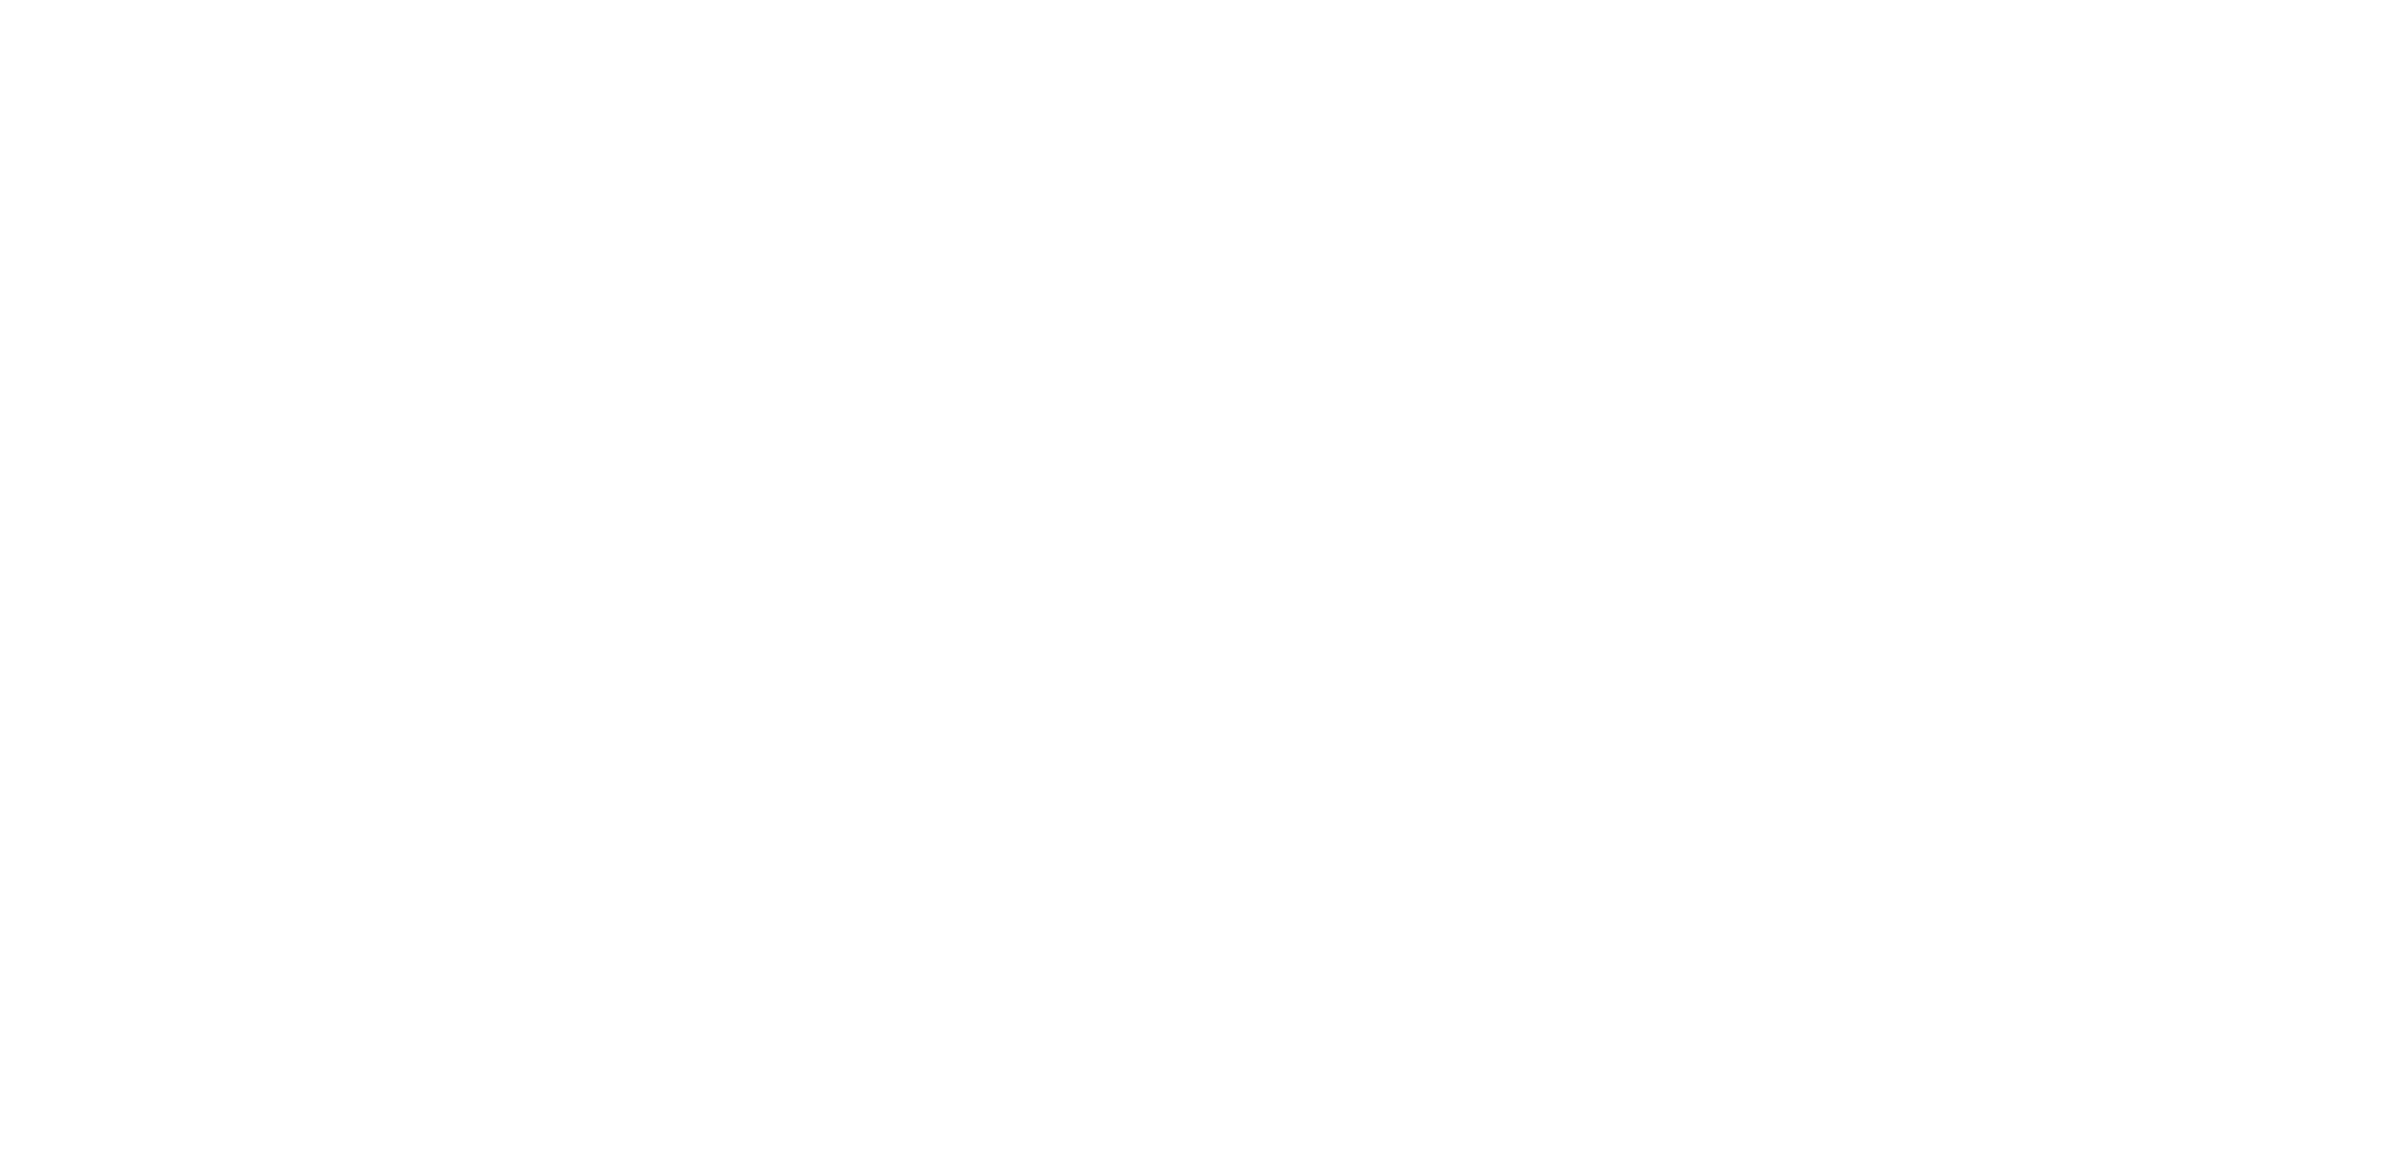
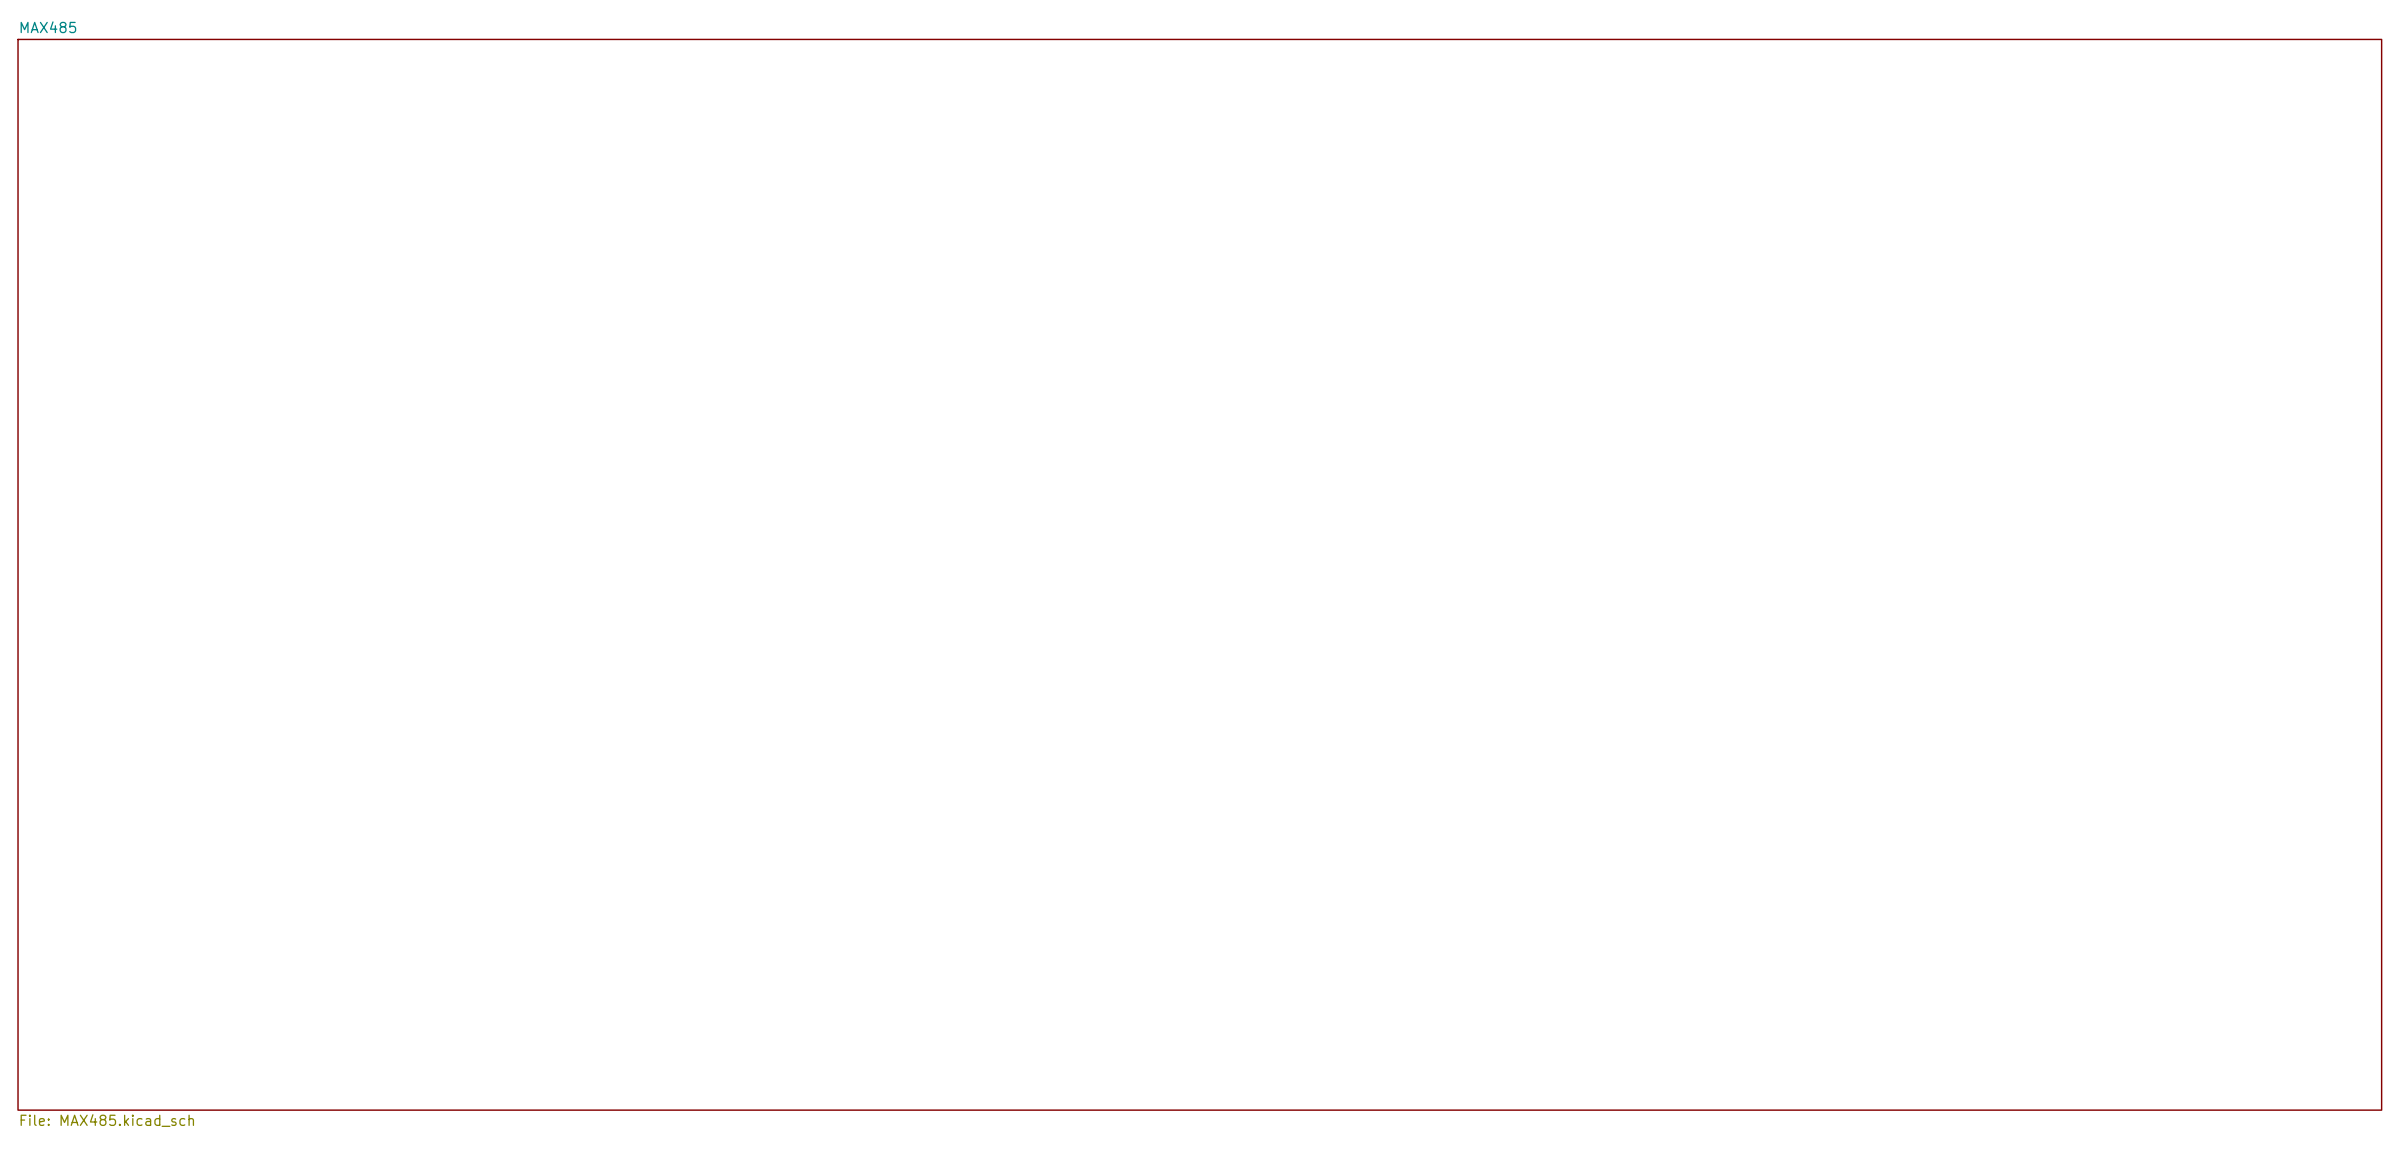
sheet MAX485: none -> File: MAX485.kicad_sch (1199, 574)

